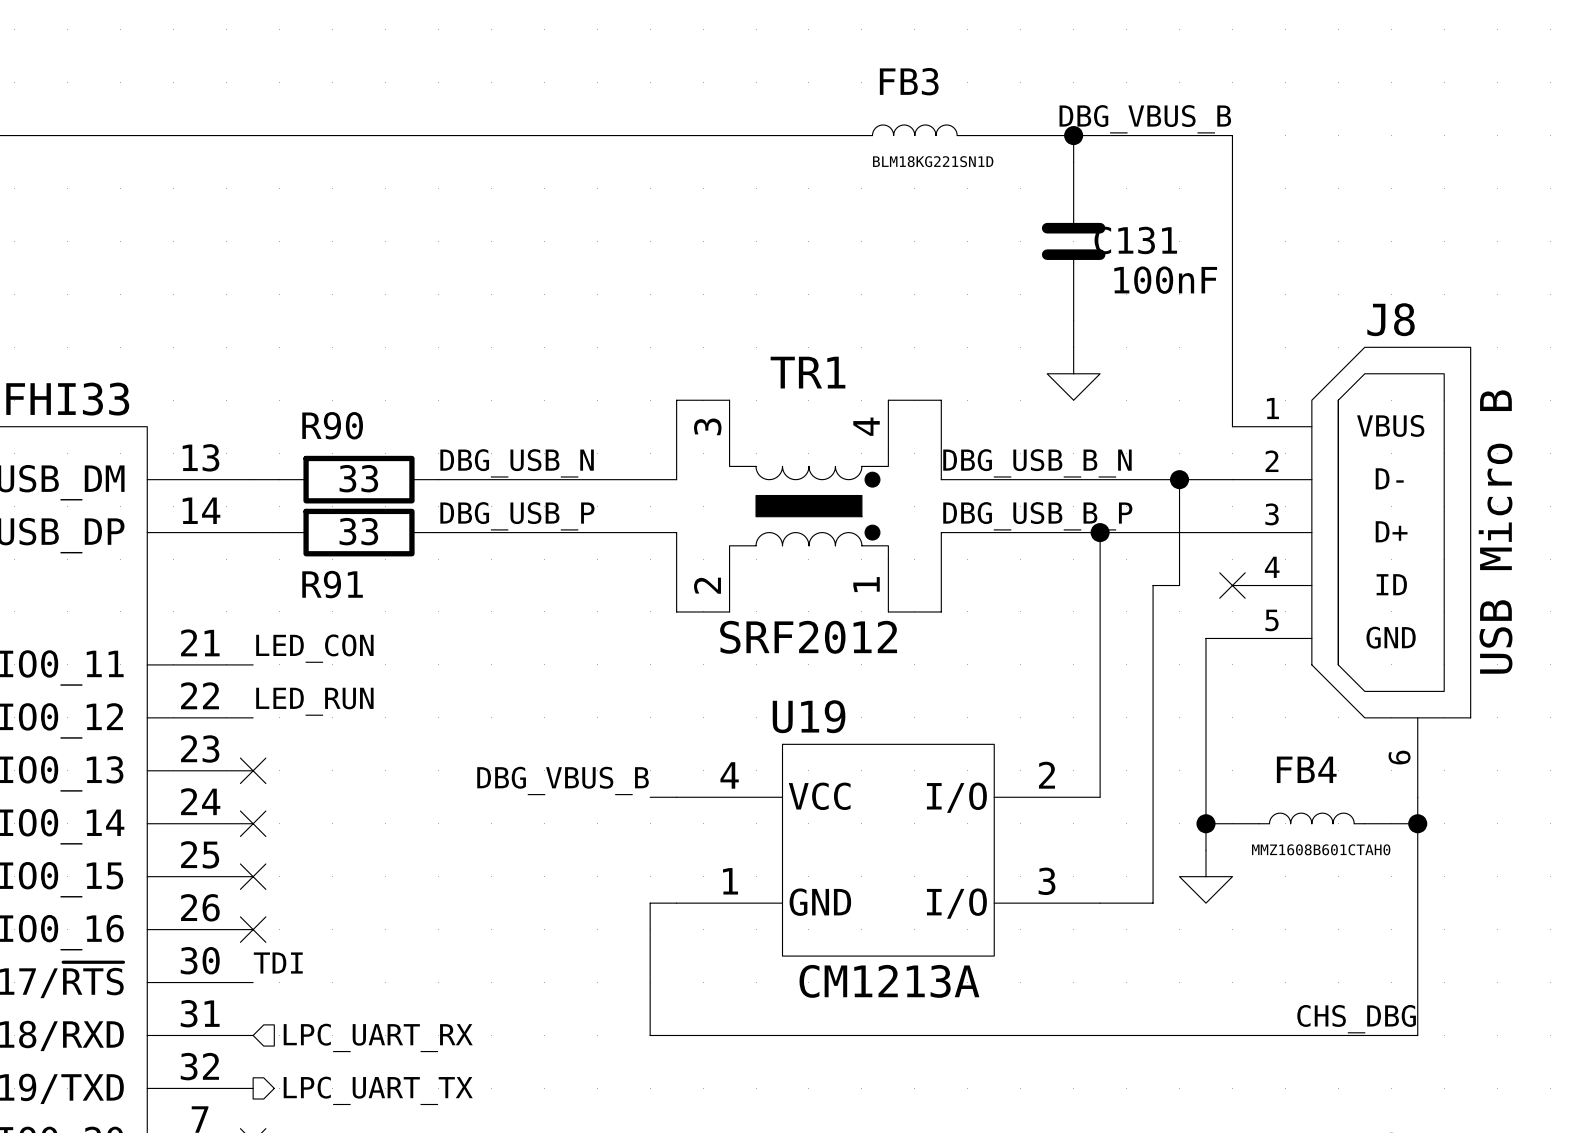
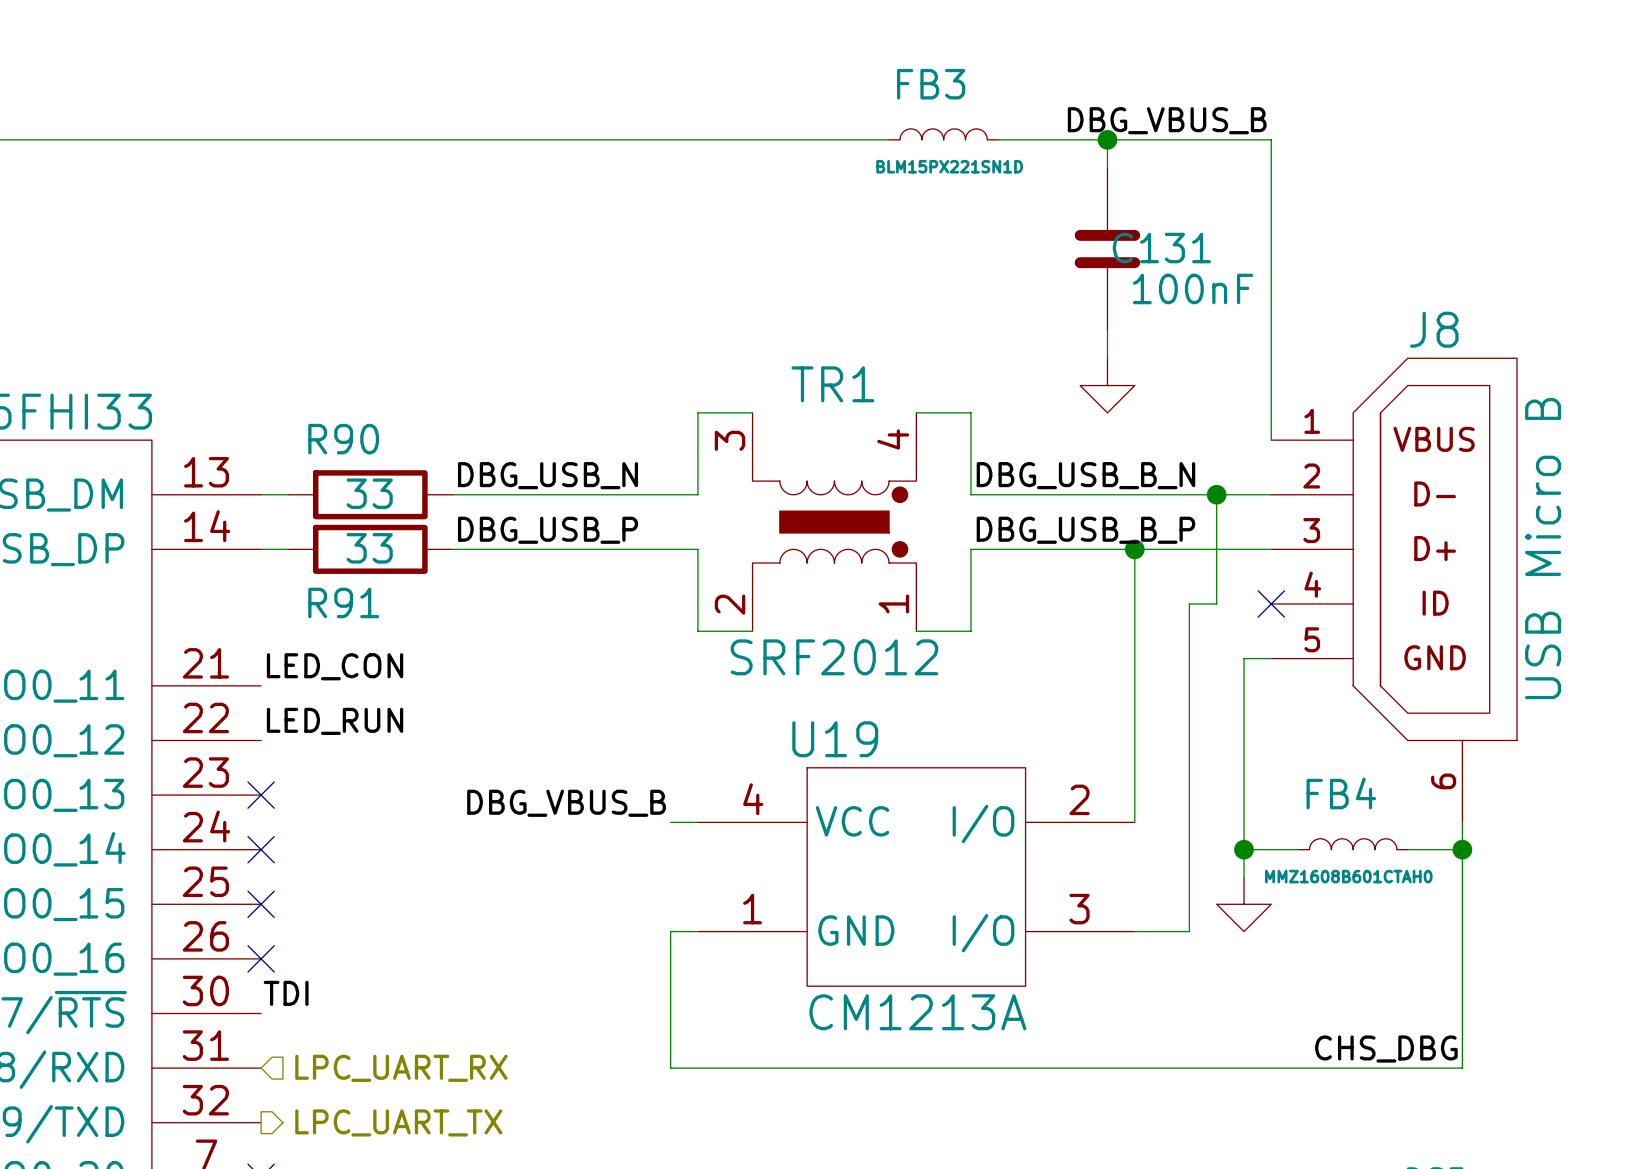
FB3 value: BLM18KG221SN1D (933, 161) -> BLM15PX221SN1D (949, 166)

